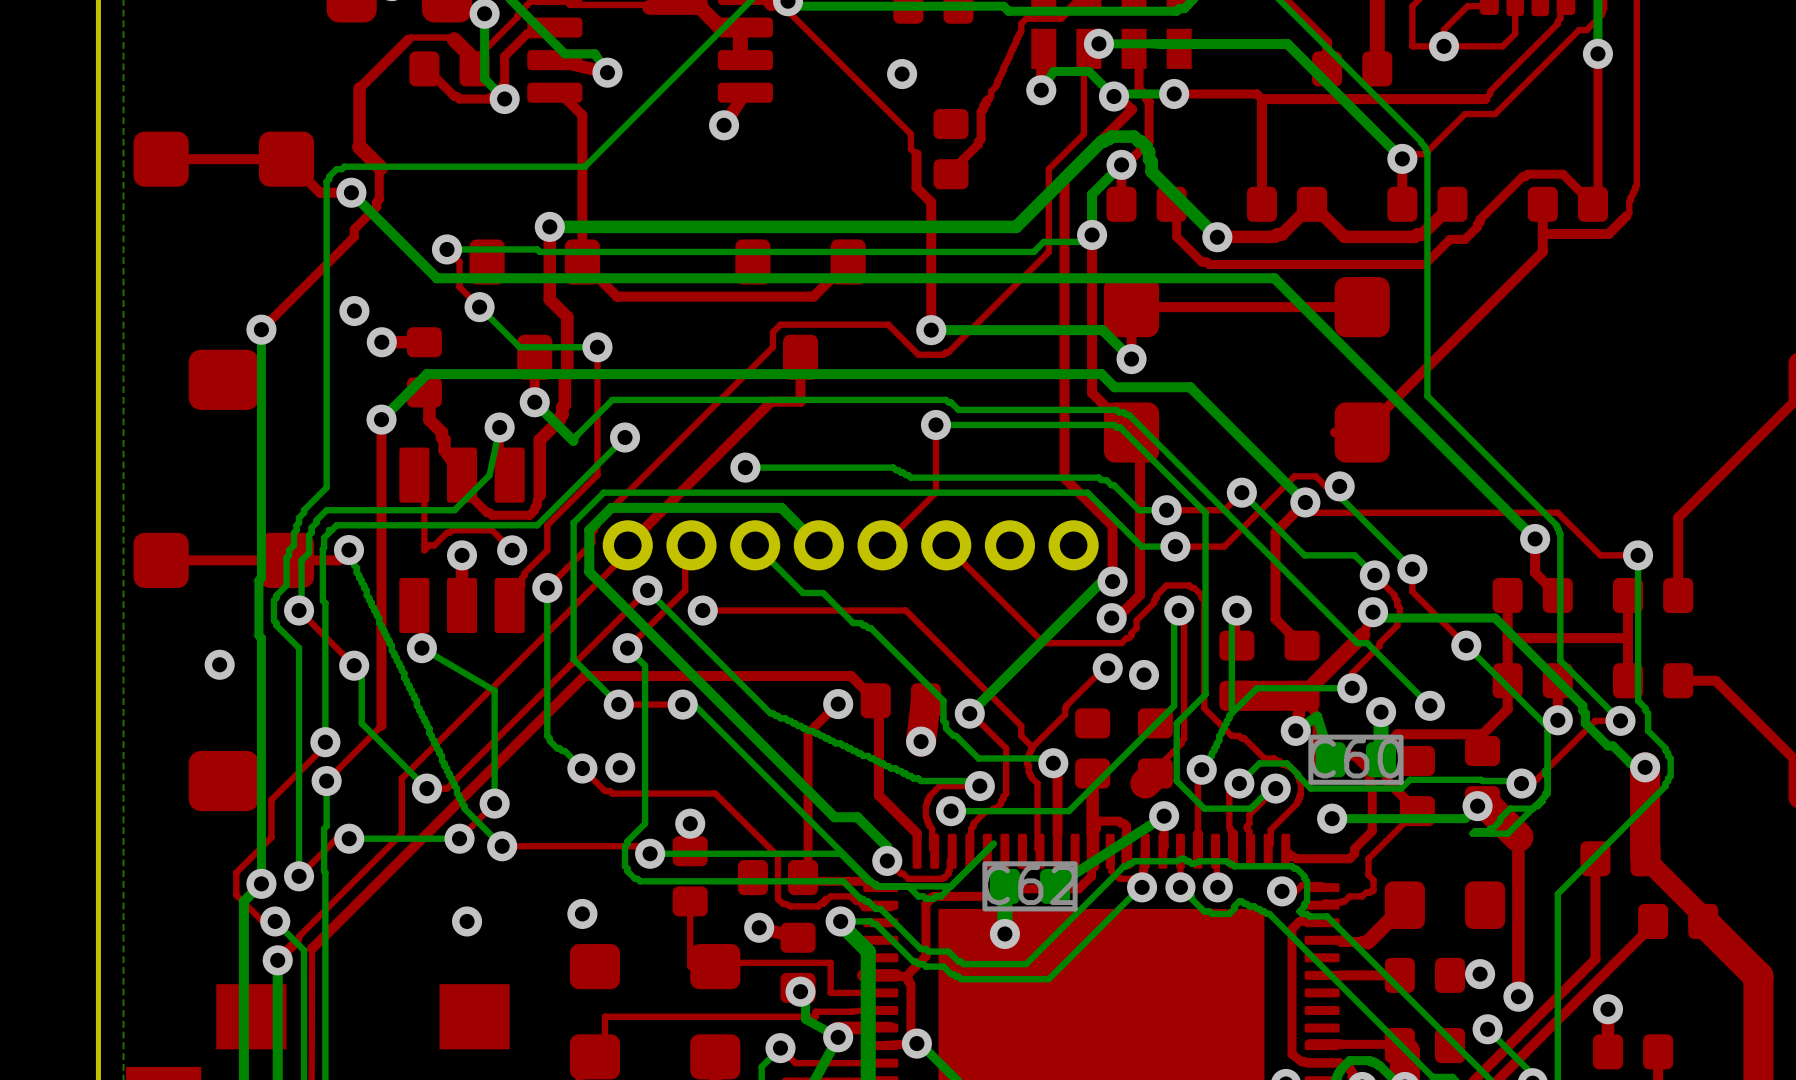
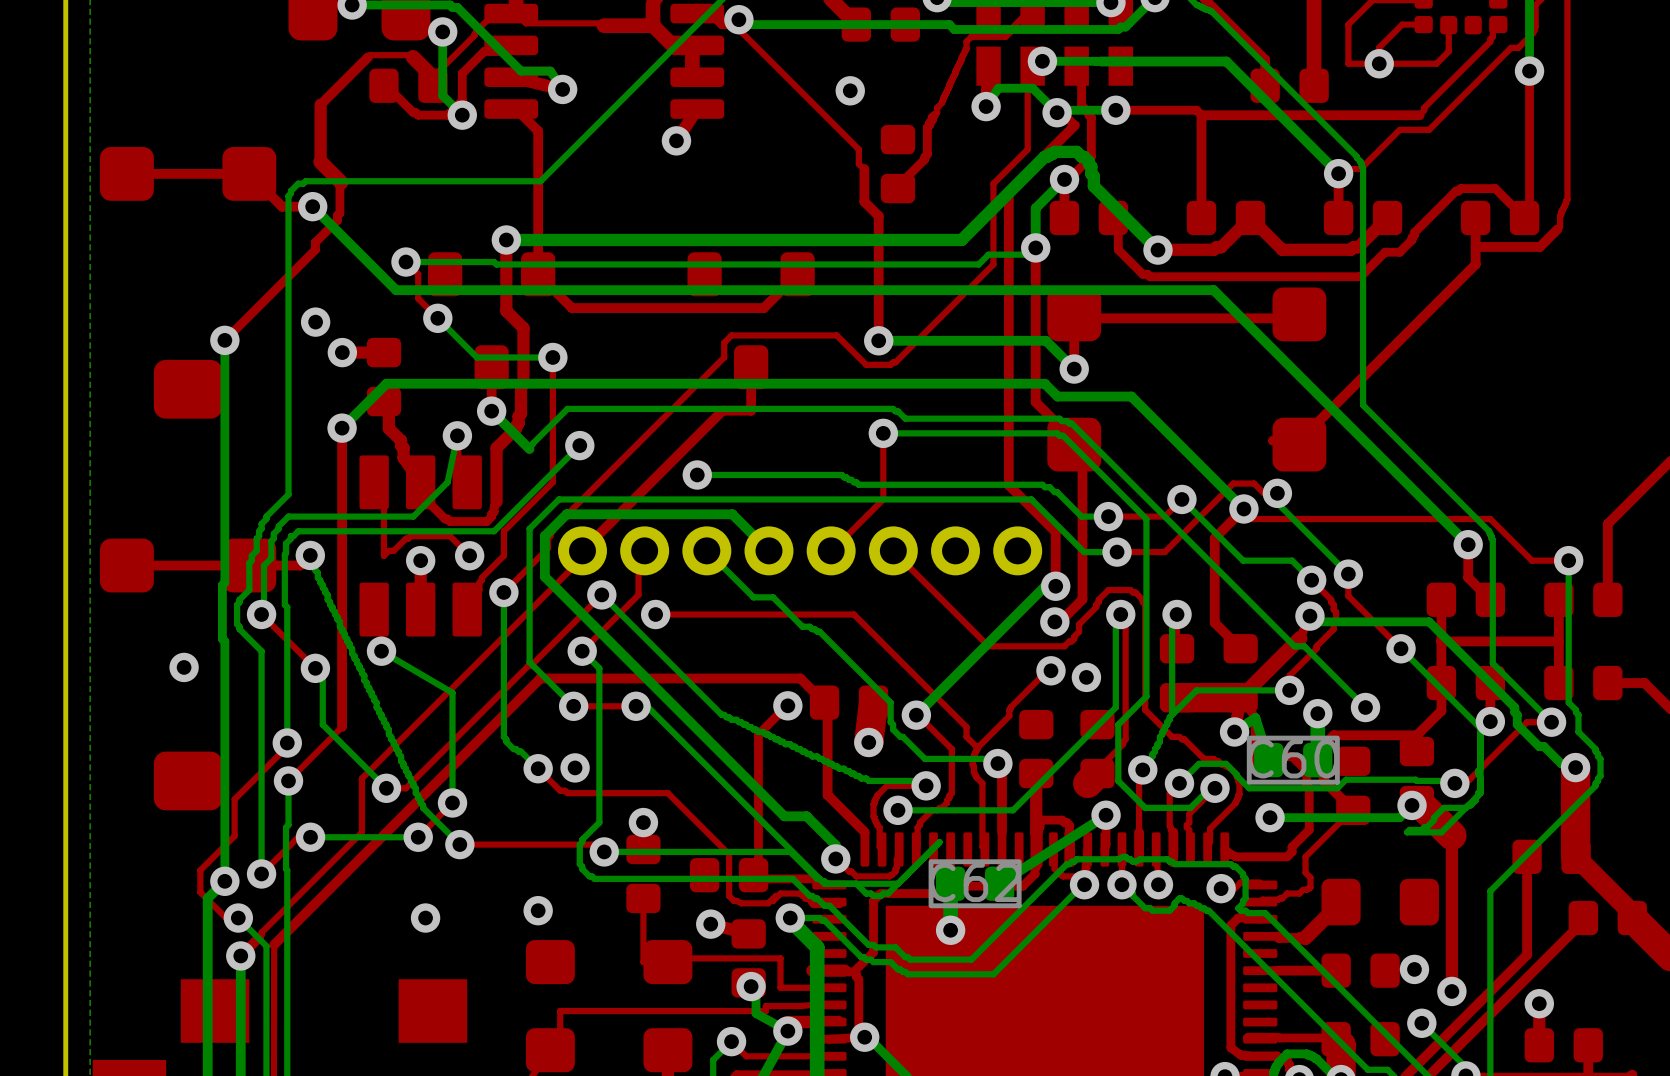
part footprint: [1103, 277, 1160, 463] -> [1047, 287, 1102, 472]
part footprint: [1334, 277, 1390, 463] -> [1272, 287, 1327, 472]

